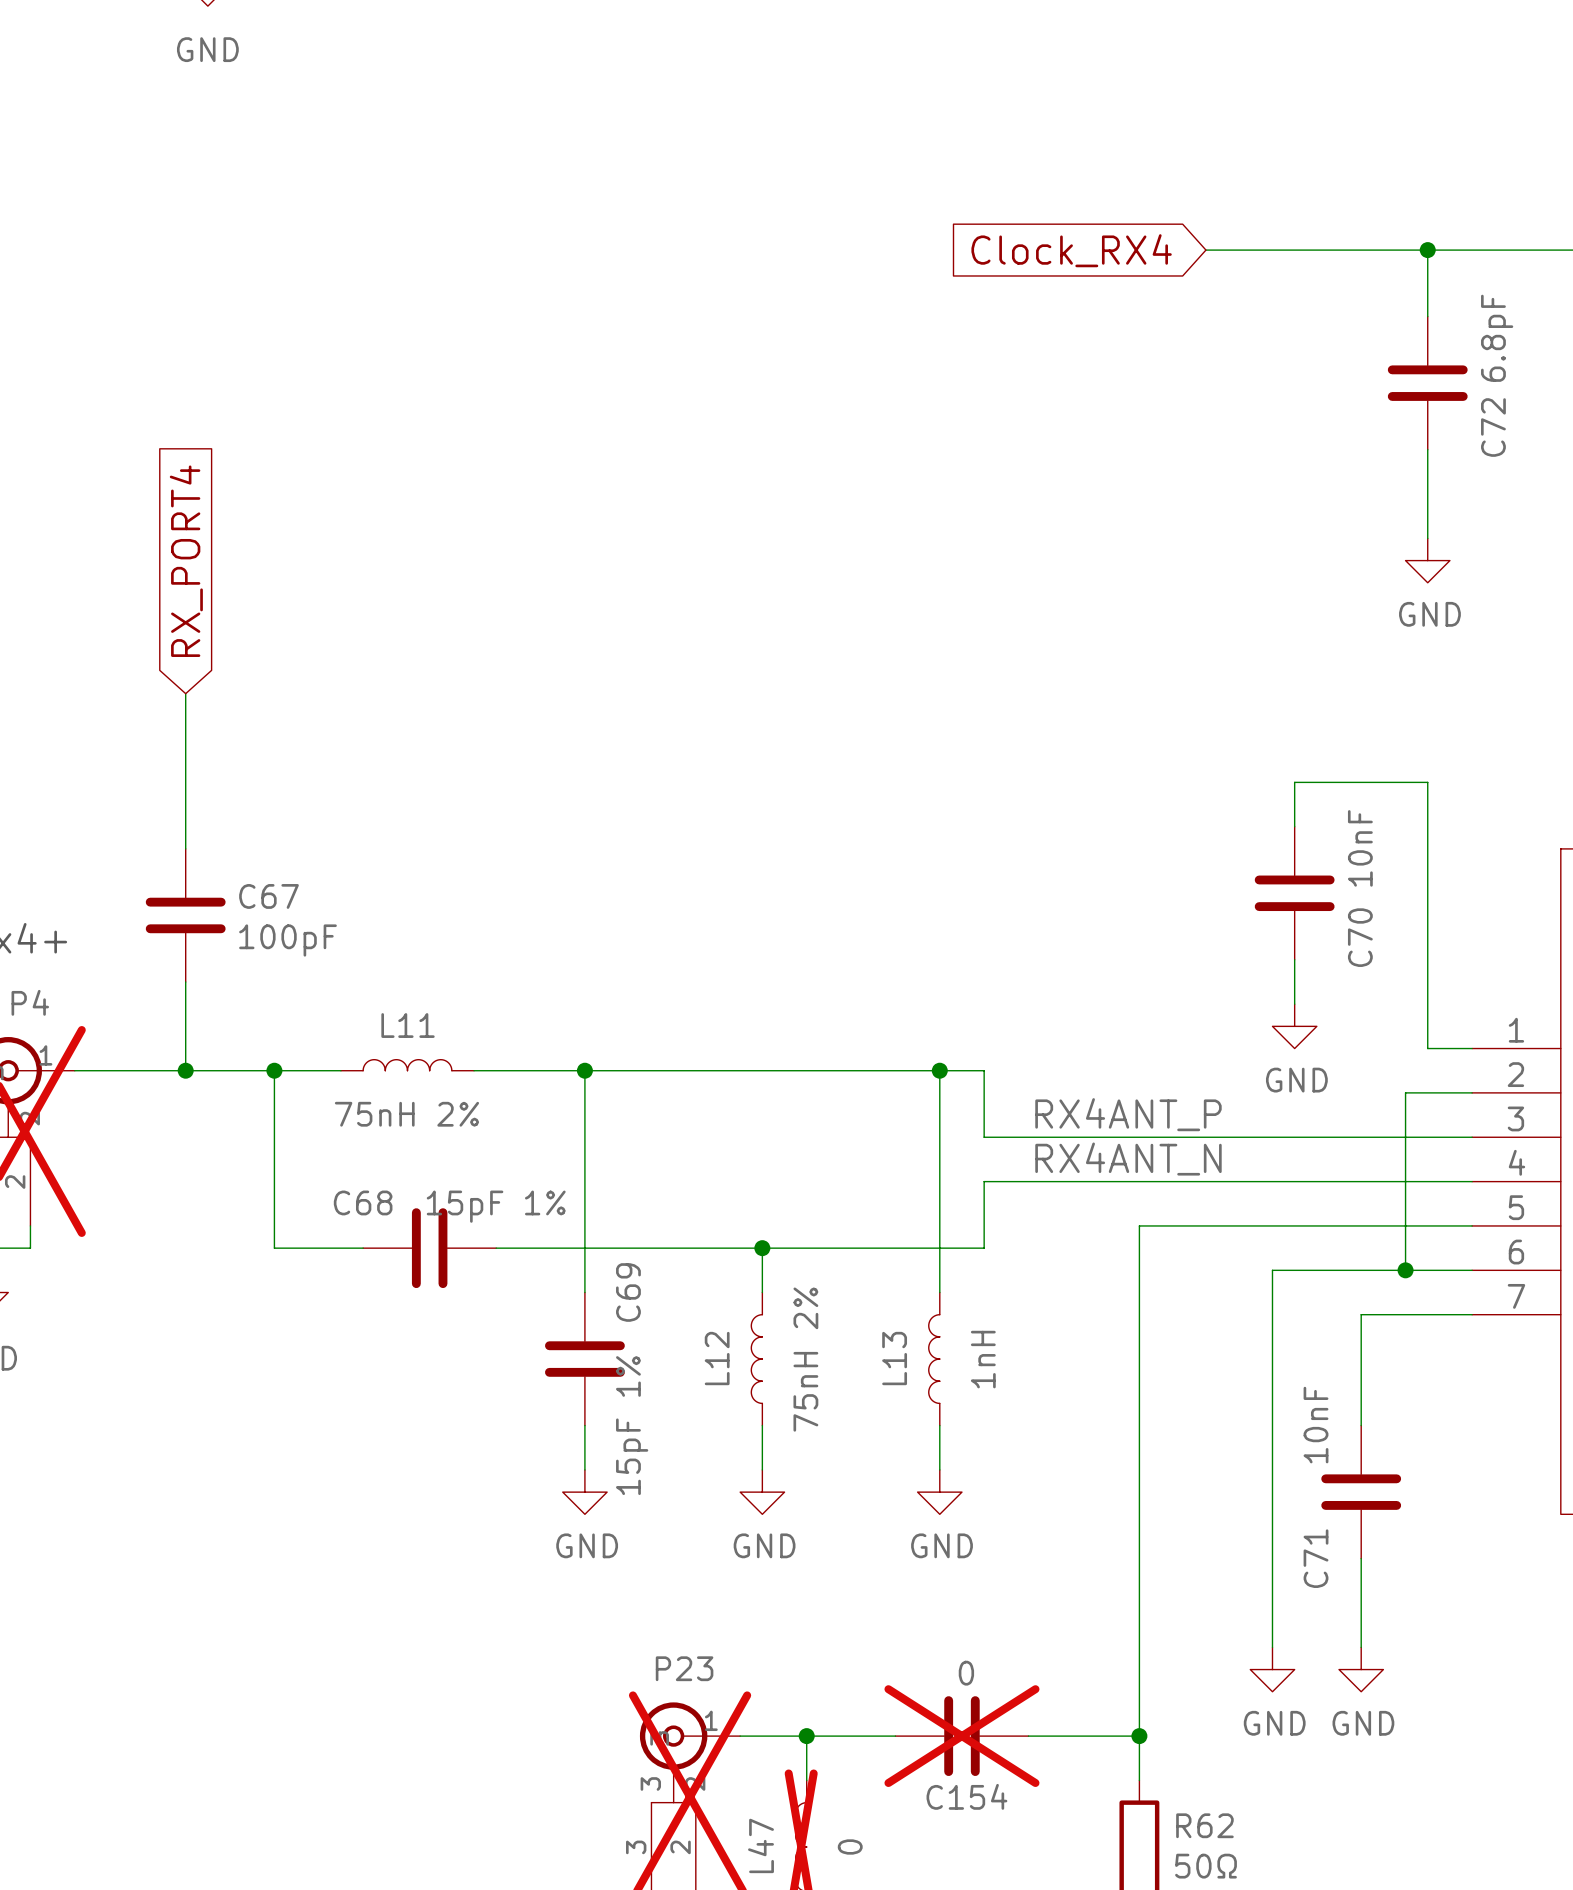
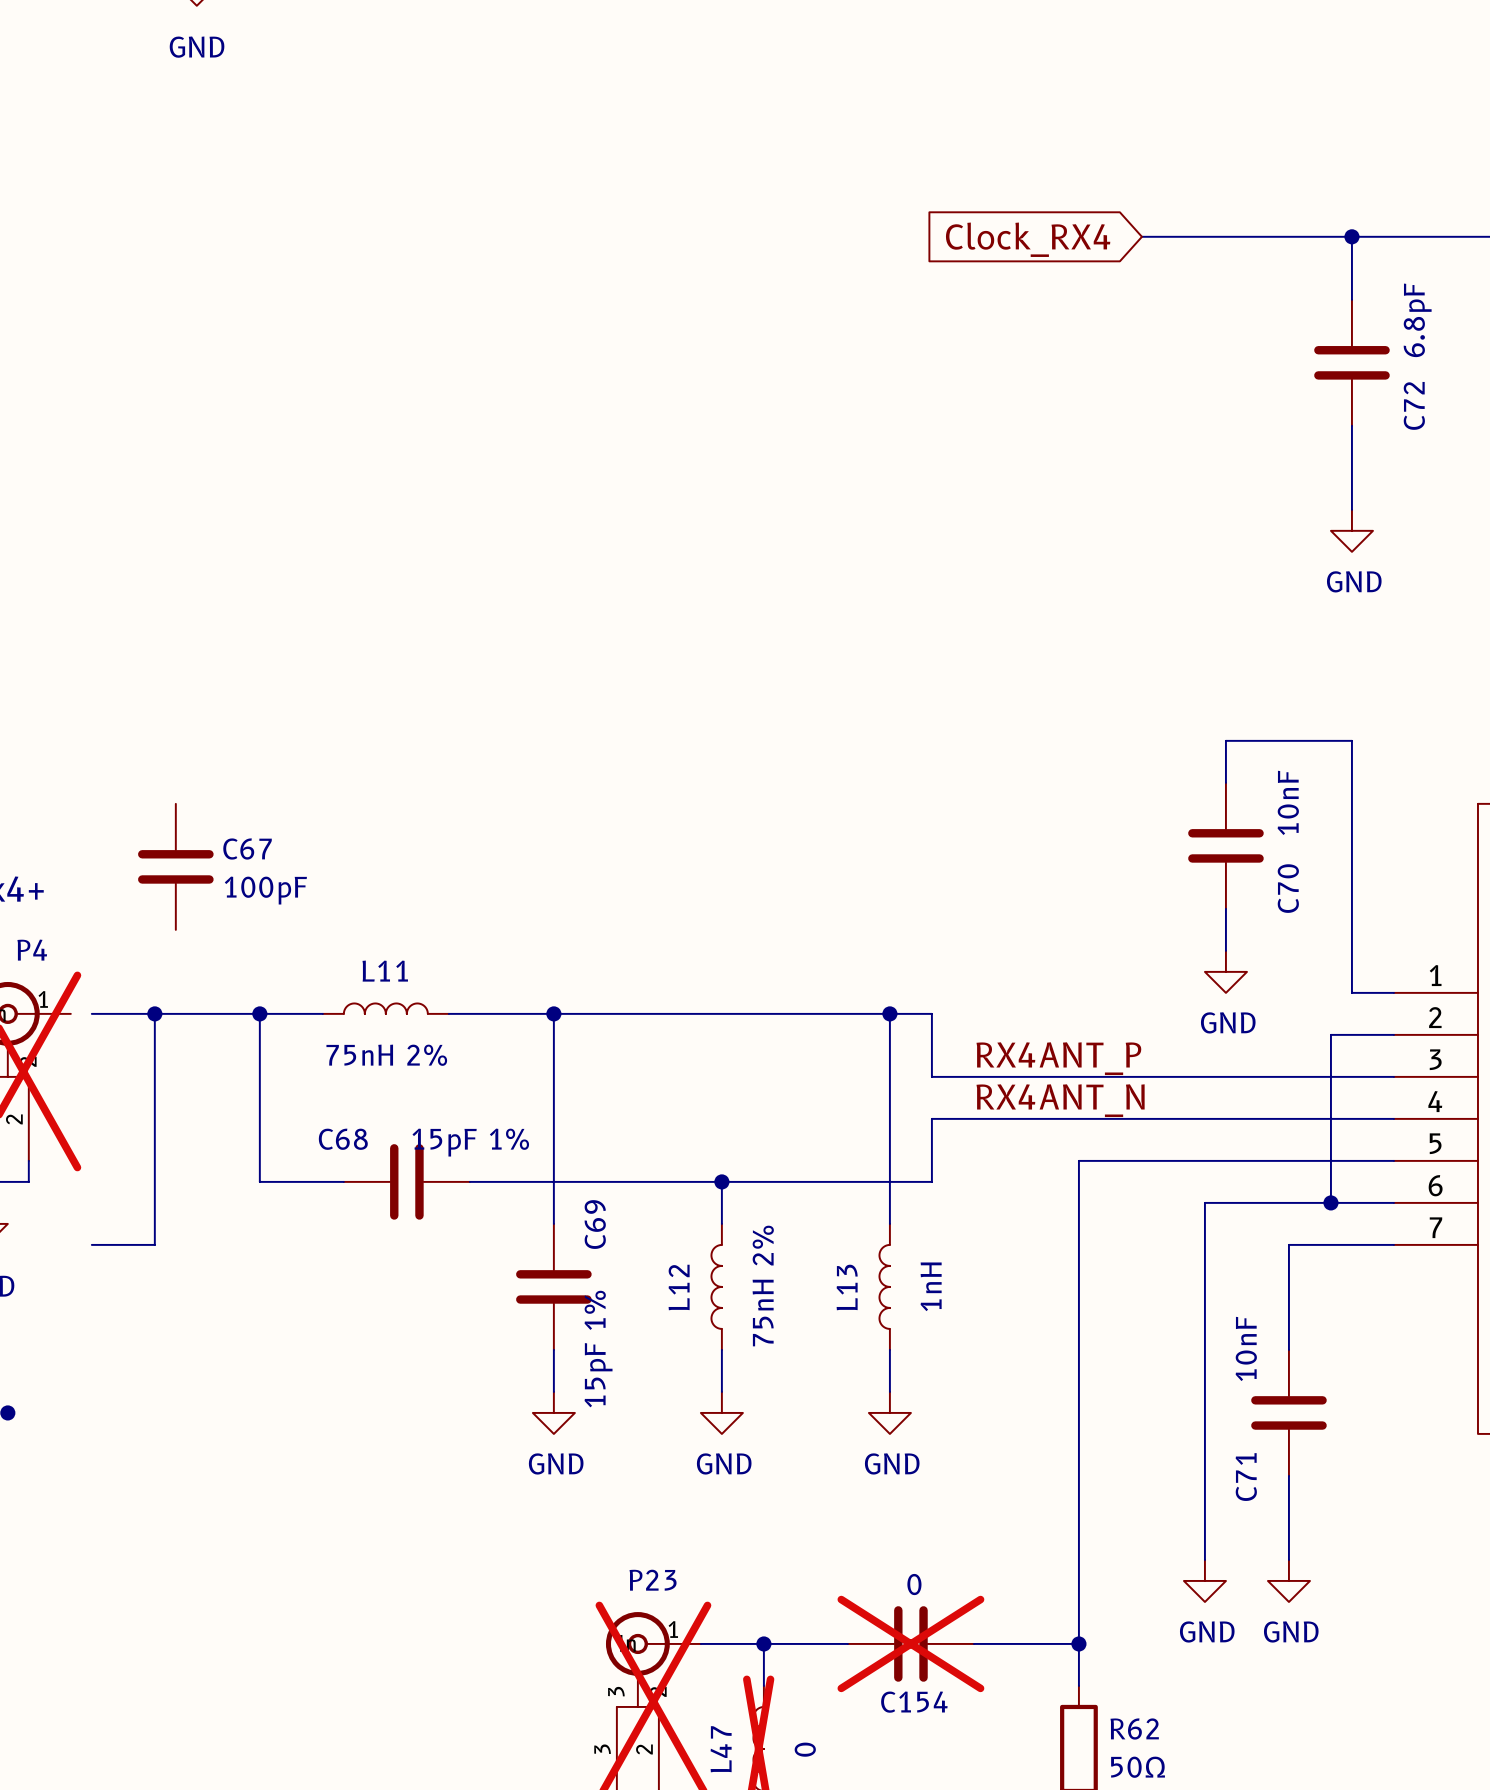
global label: RX_PORT4 (186, 561) -> none
wire: (185, 693) (185, 848) -> none
wire: (185, 982) (185, 1070) -> none
wire: (74, 1070) (96, 1070) -> none
wire: none -> (154, 1013) (154, 1244) (91, 1244)
junction position: (185, 1070) -> (154, 1013)
junction: none -> (7, 1412)

